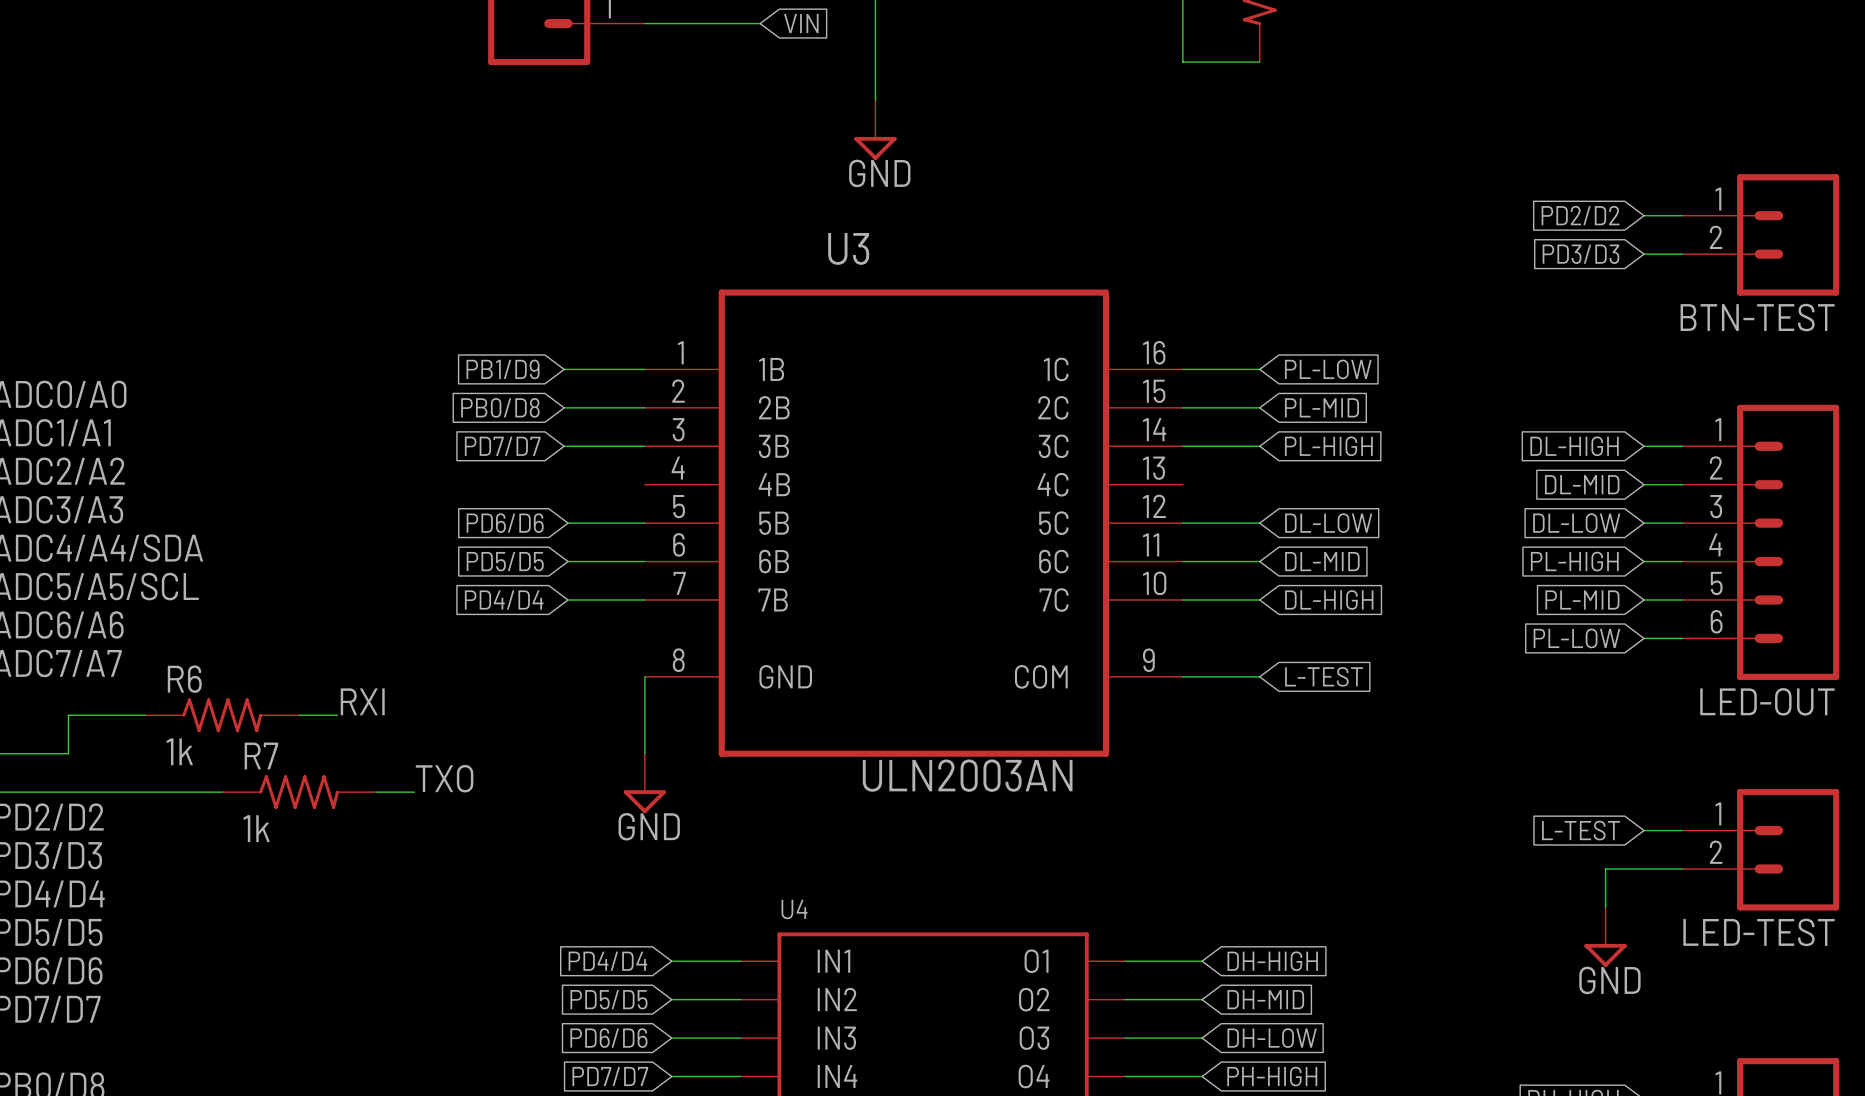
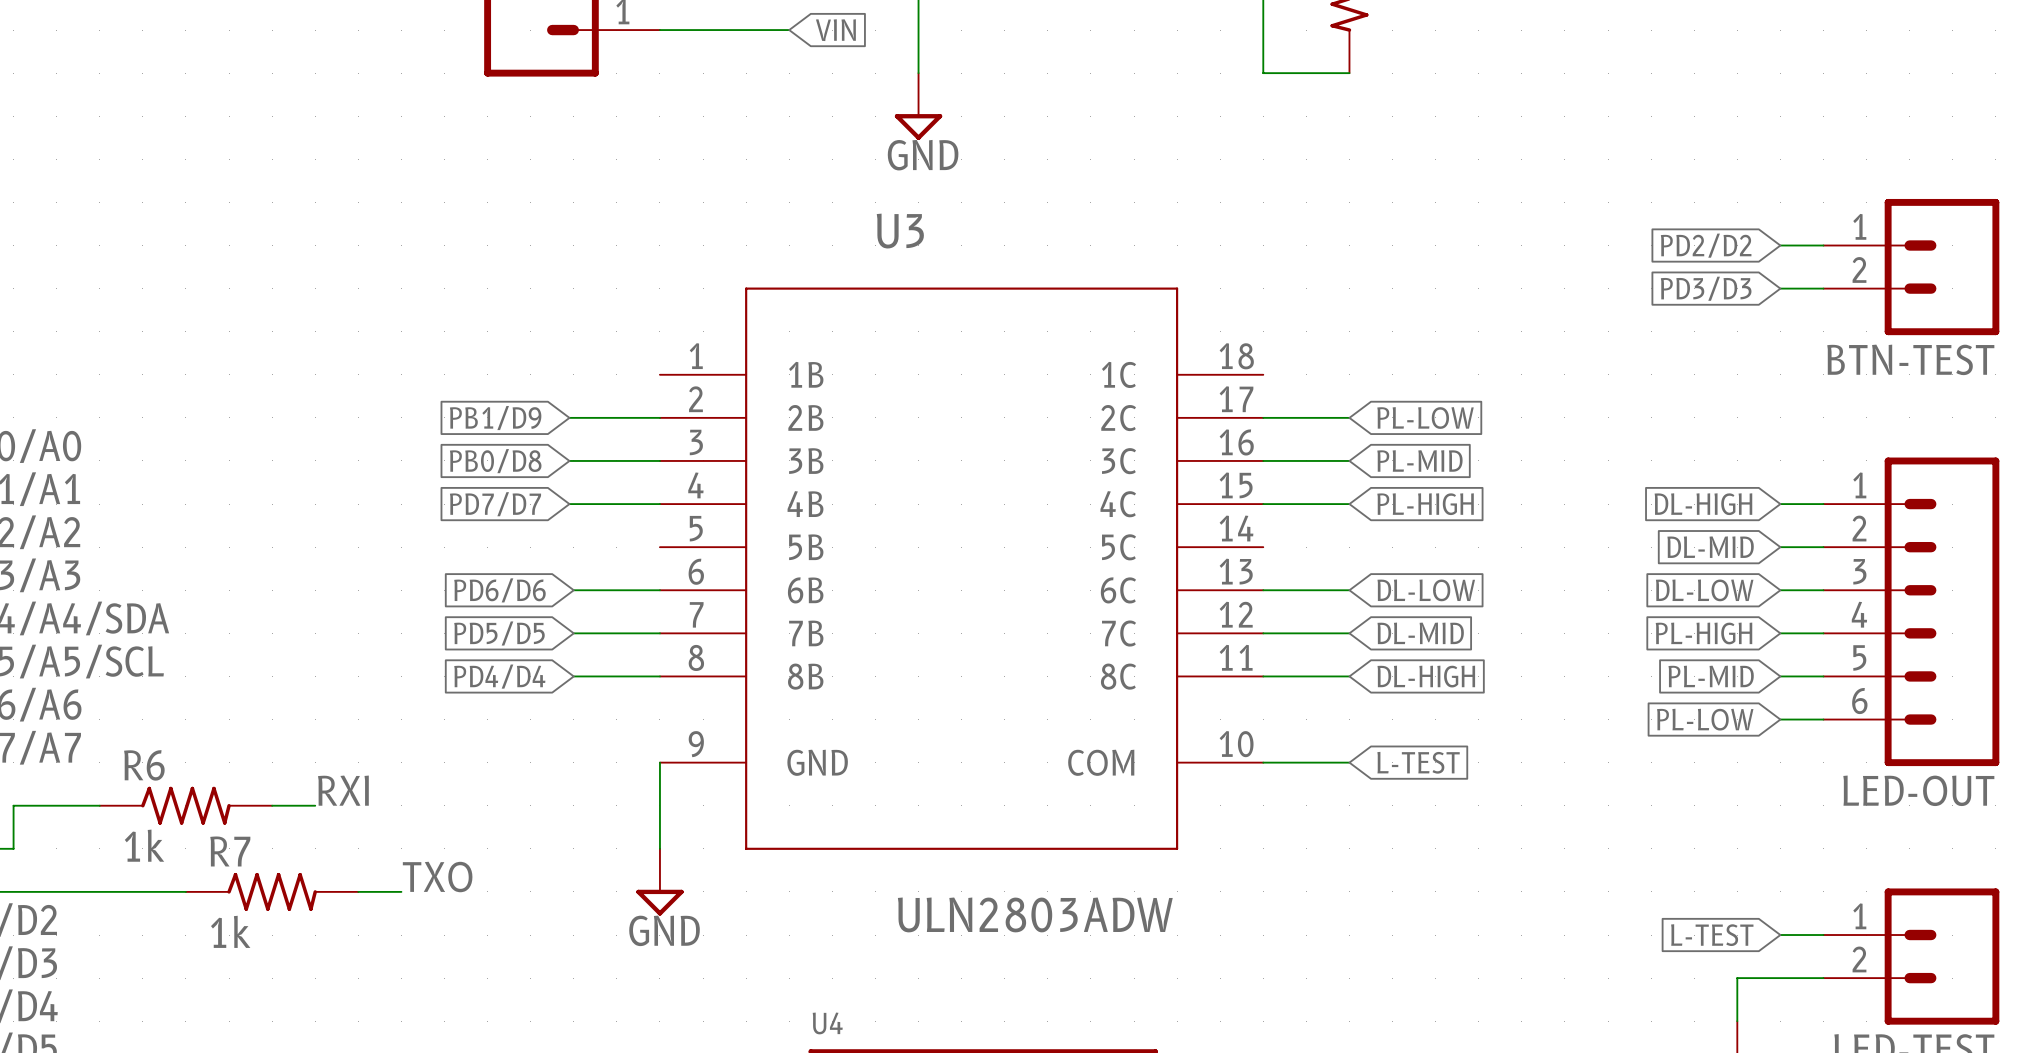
power symbol position: GND (875, 130) -> GND (918, 106)
U3 symbol: [644, 289, 1183, 757] -> [659, 287, 1264, 850]
U3 value: ULN2003AN (967, 775) -> ULN2803ADW (1035, 914)

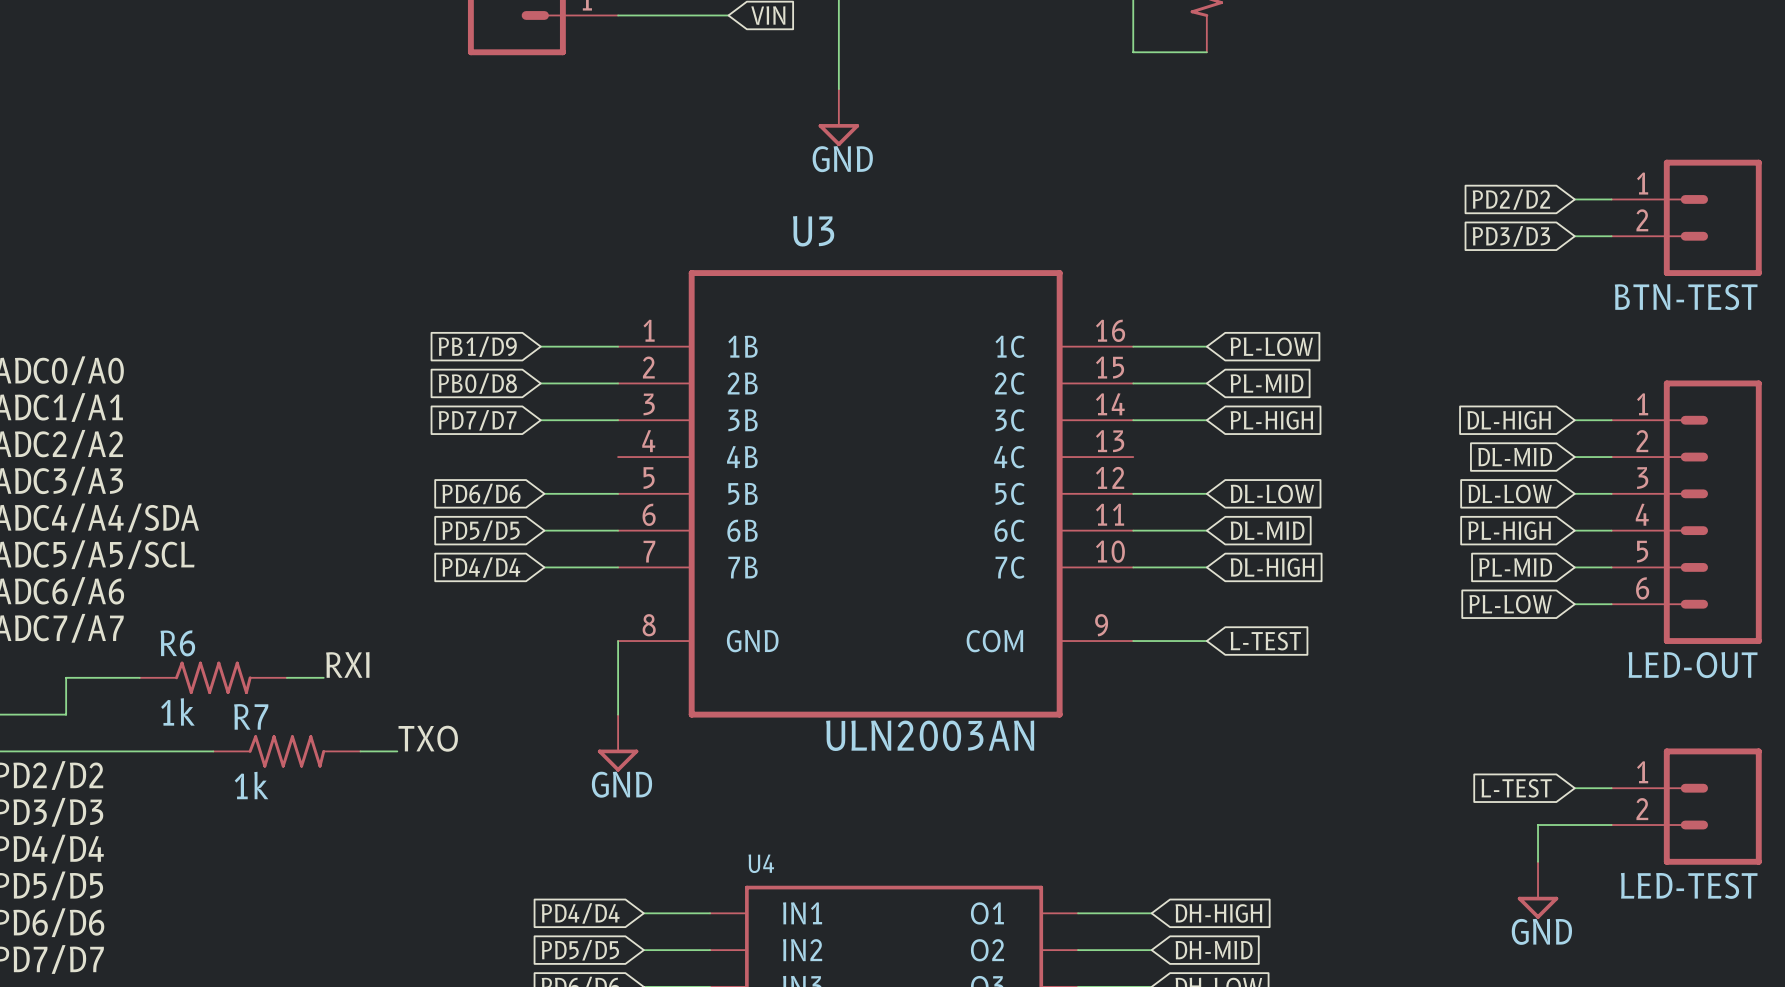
power symbol position: GND (918, 106) -> GND (838, 117)
U3 symbol: [659, 287, 1264, 850] -> [618, 270, 1134, 718]
U3 value: ULN2803ADW (1035, 914) -> ULN2003AN (930, 735)

